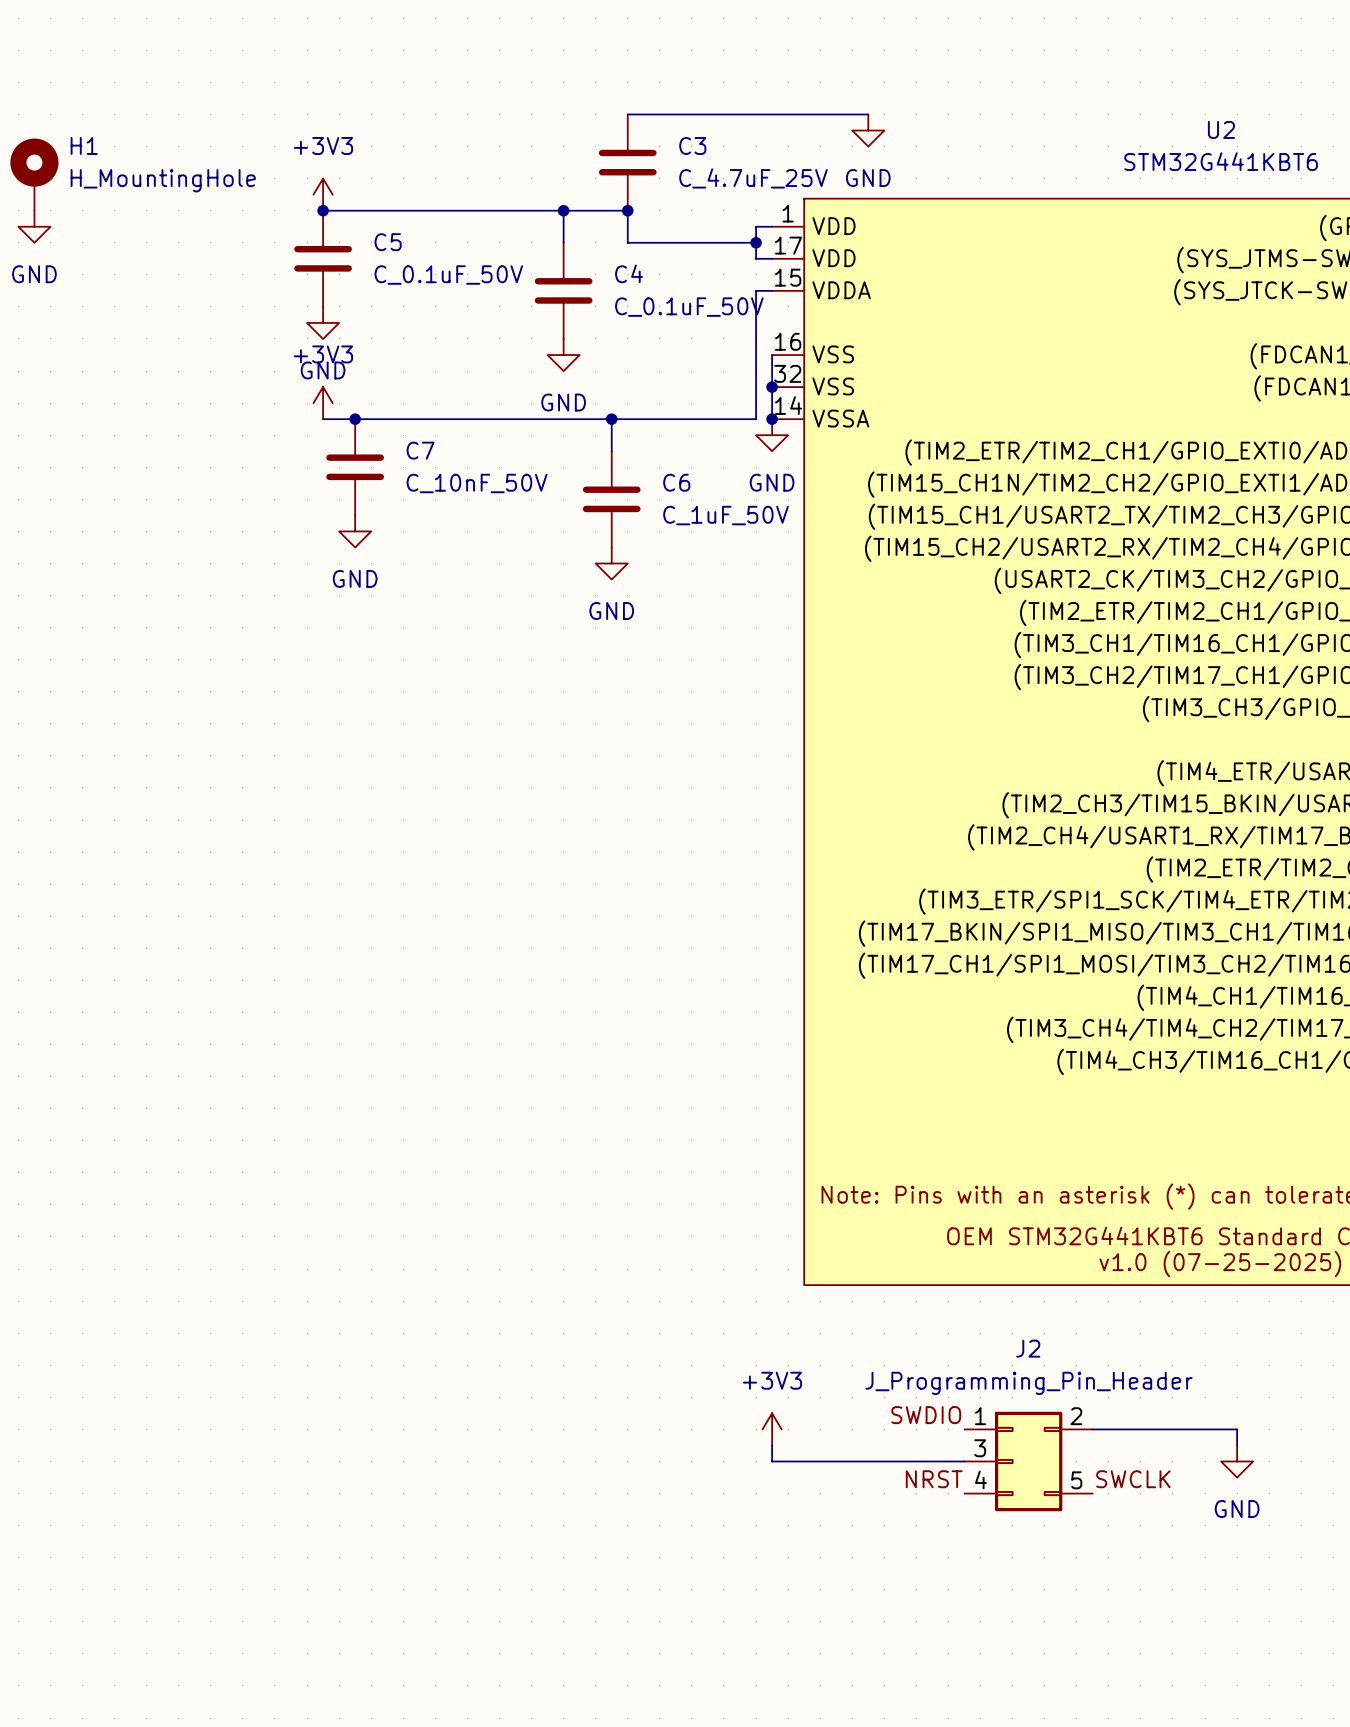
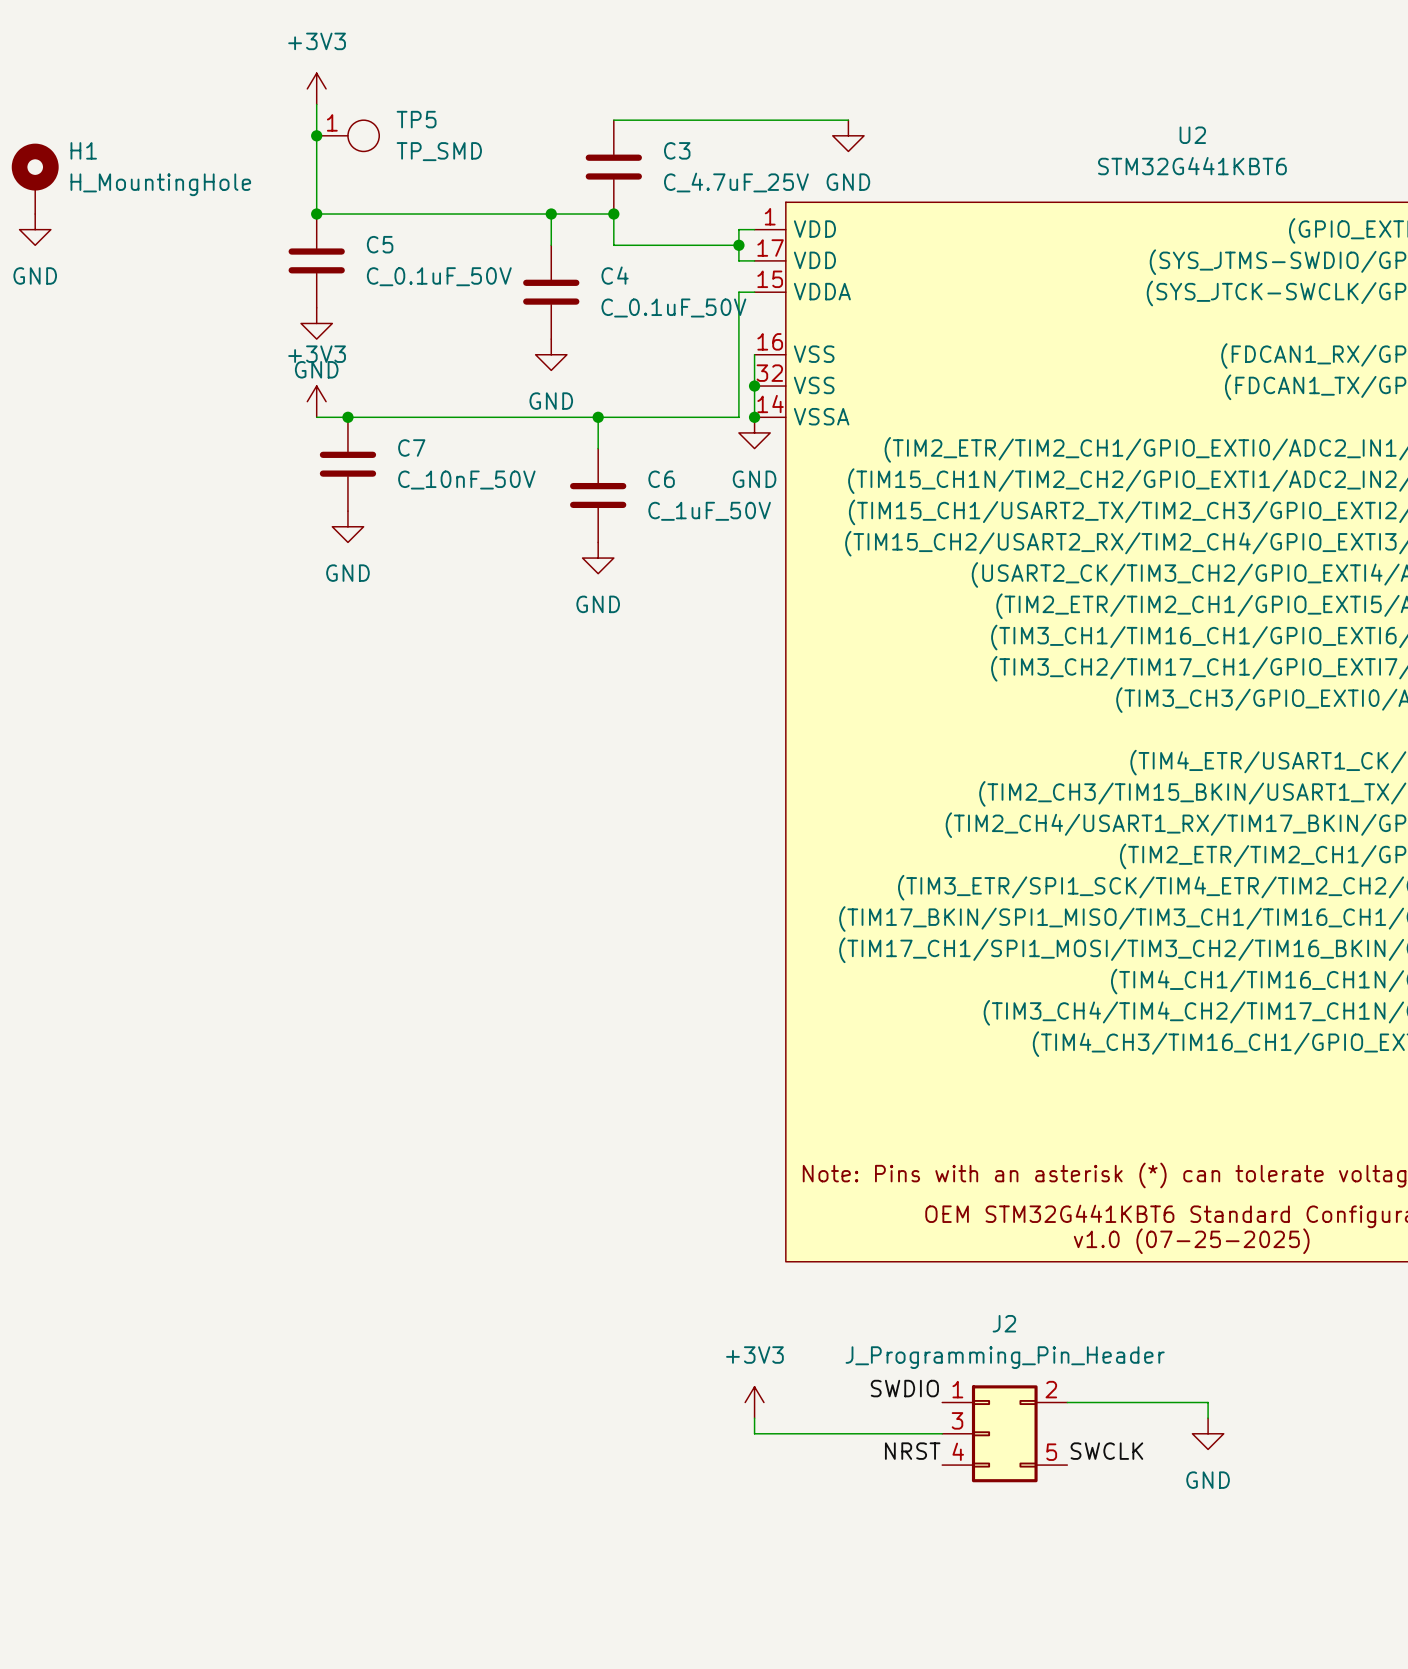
wire: none -> (316, 104) (316, 214)
junction: none -> (316, 135)
TP5: none -> TP_SMD (347, 135)
power symbol position: +3V3 (323, 194) -> +3V3 (316, 88)

